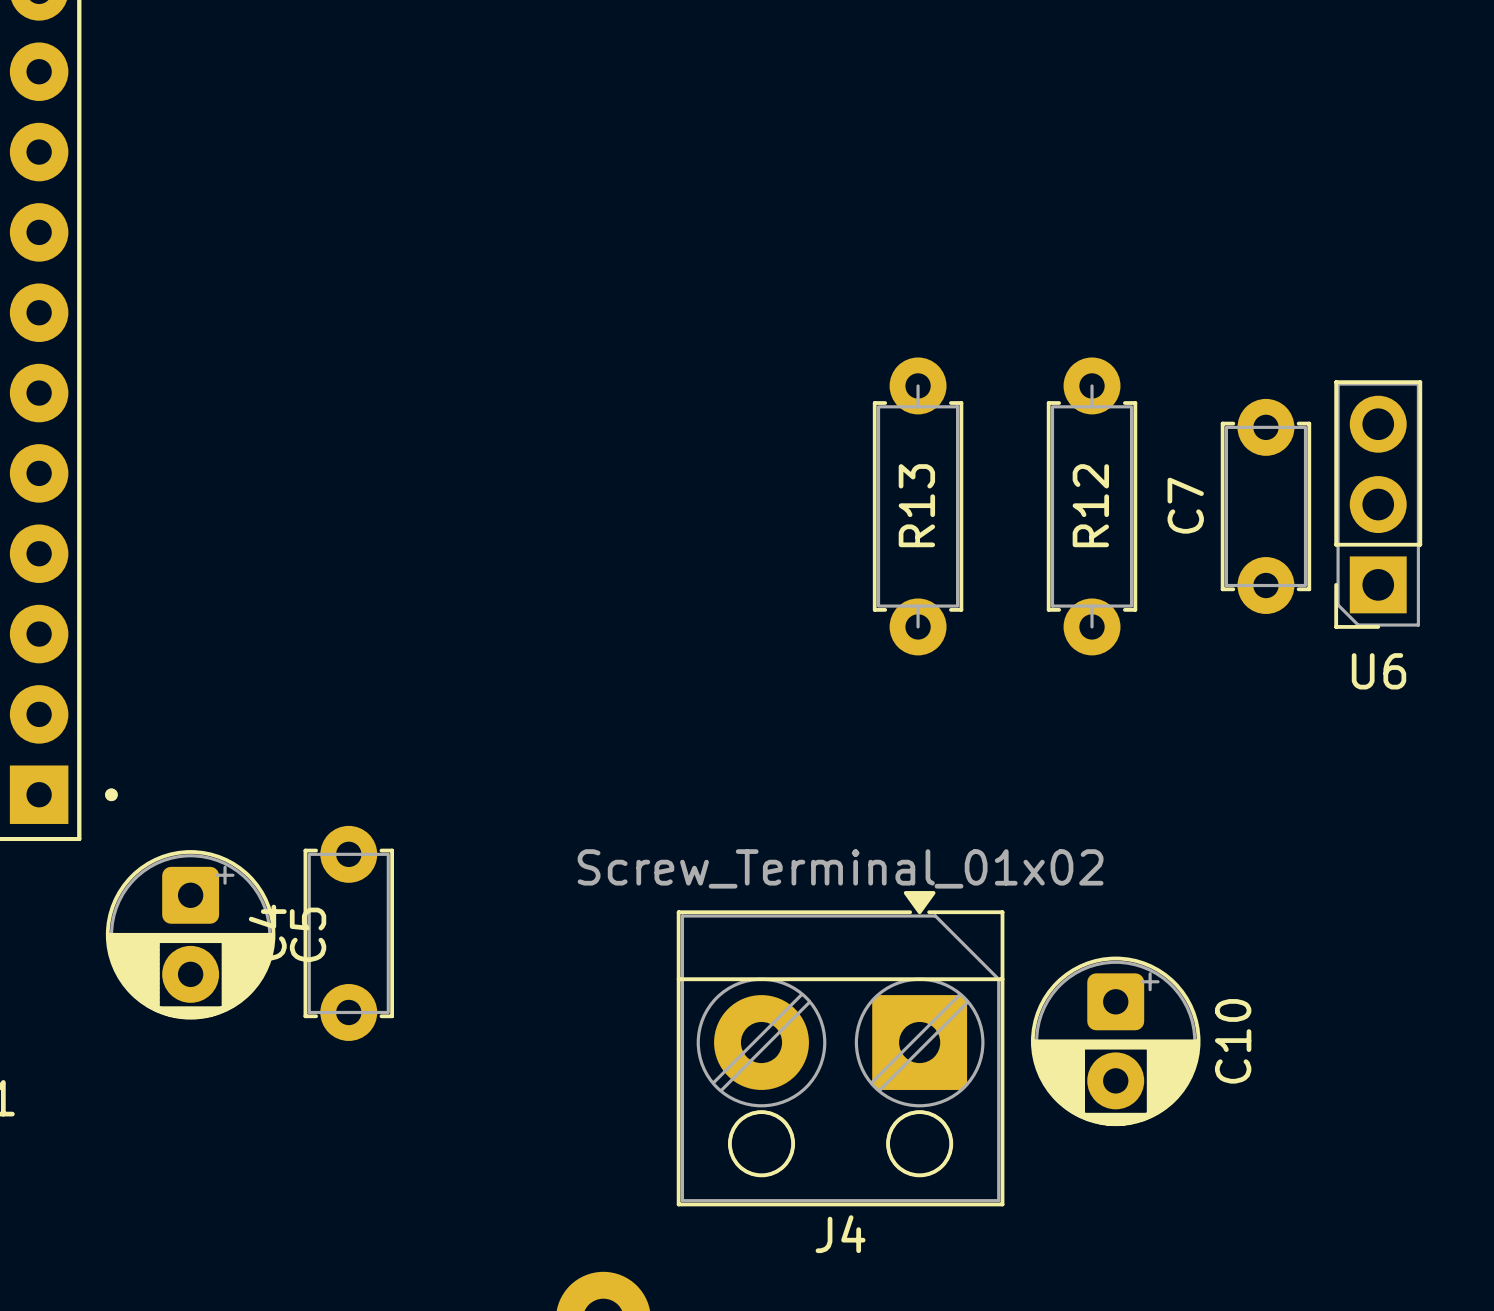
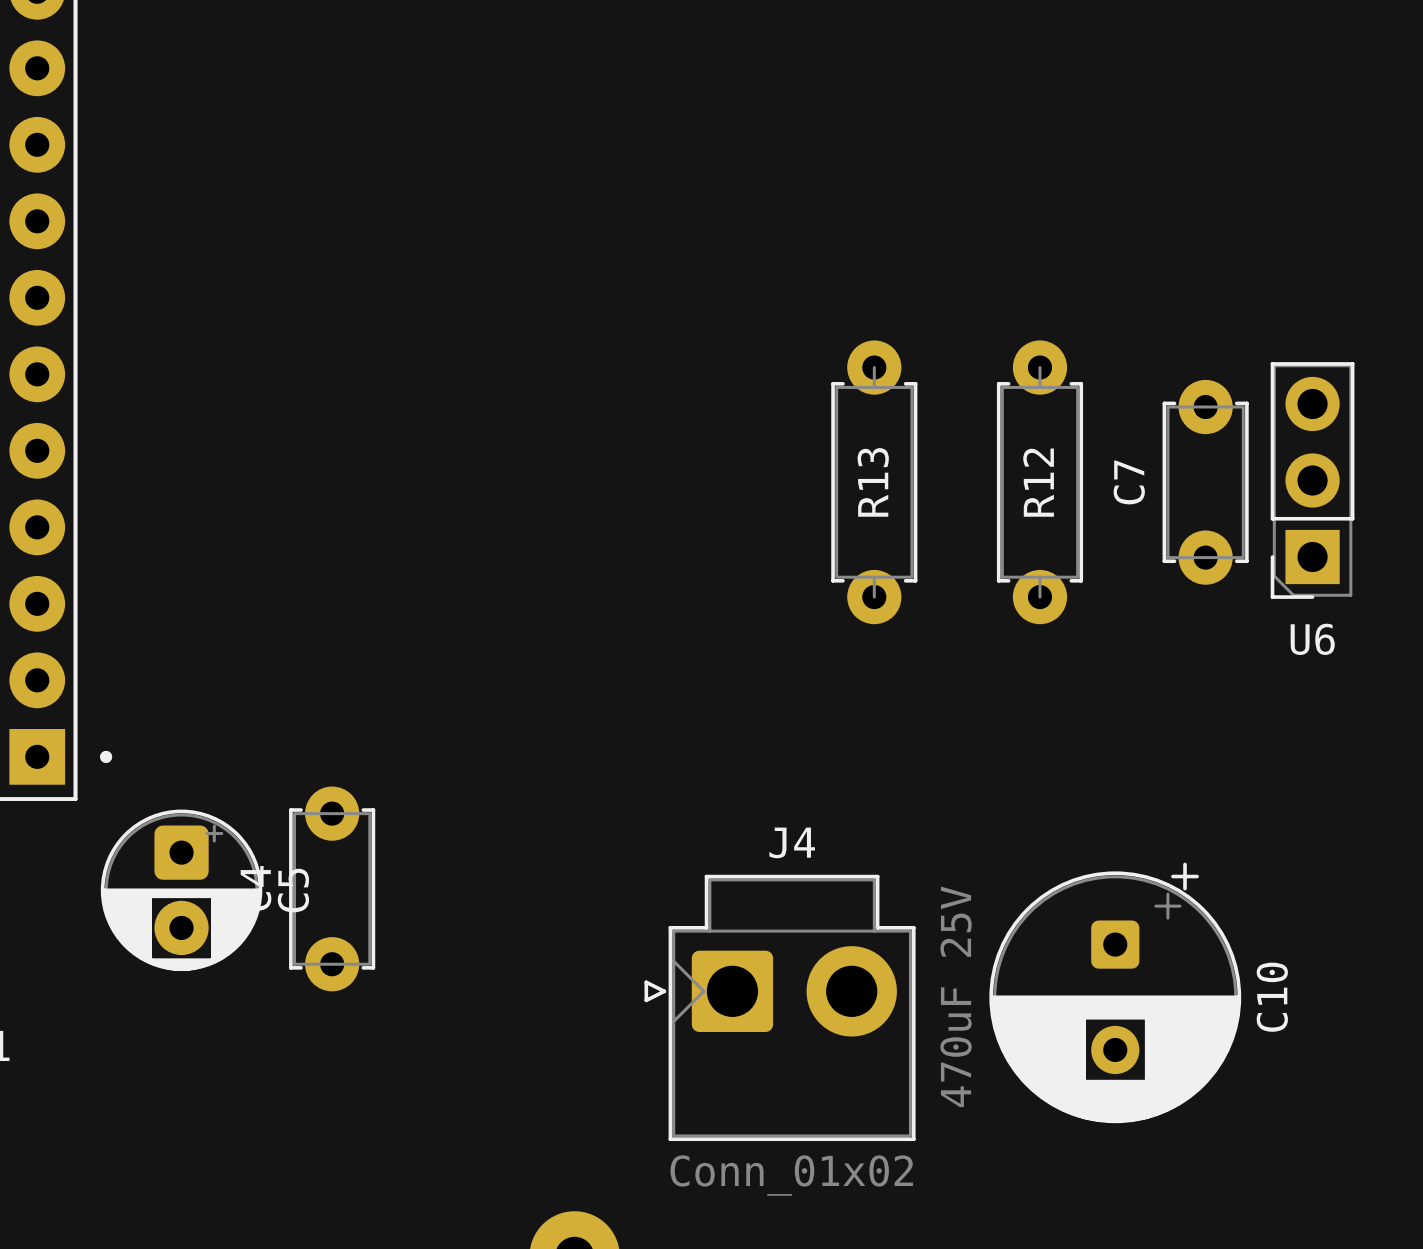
J4 value: Screw_Terminal_01x02 (840, 868) -> Conn_01x02 (791, 1175)
J4 footprint: [676, 891, 1005, 1207] -> [644, 874, 916, 1142]
C10 footprint: [1030, 956, 1201, 1127] -> [989, 862, 1242, 1124]
C10 value: none -> 470uF 25V (956, 996)
J4 name position: J4 (840, 1234) -> J4 (792, 842)

